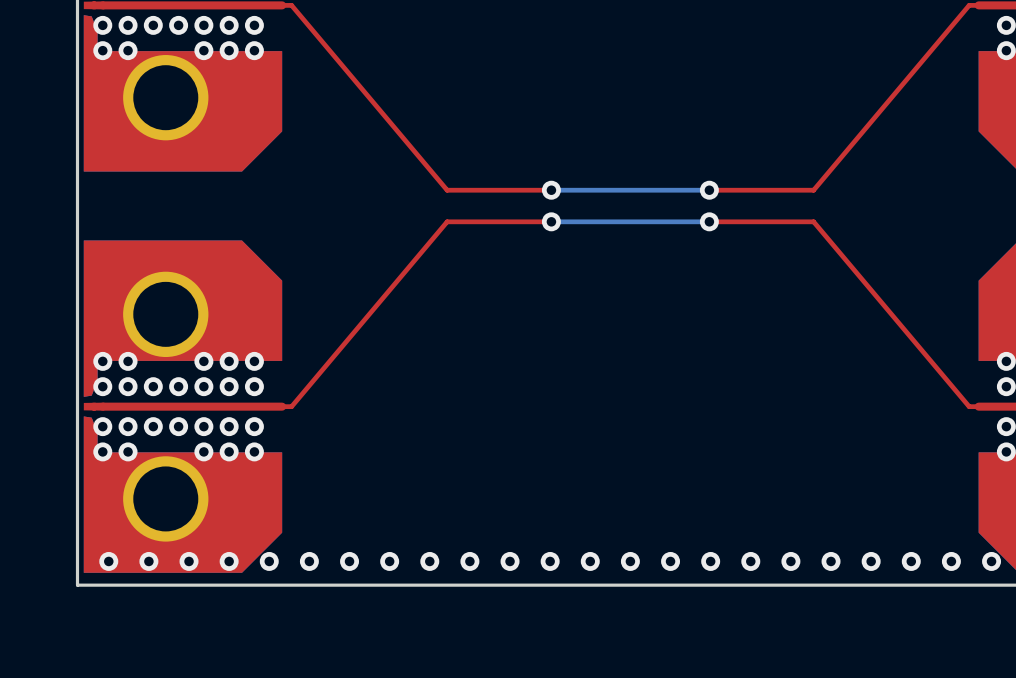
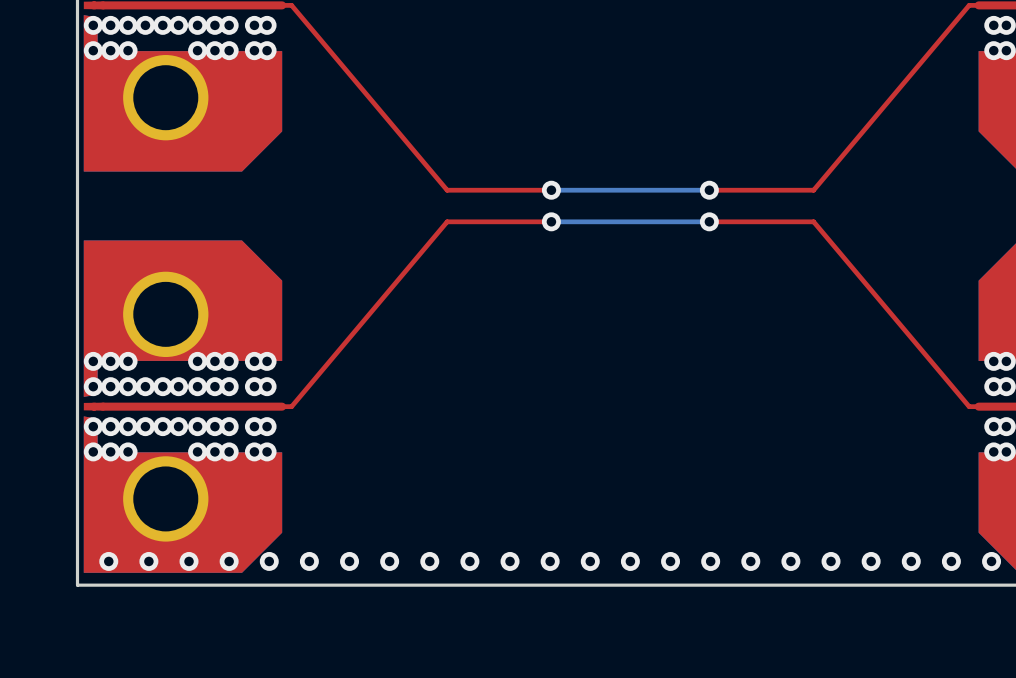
via: none -> (93, 25)
via: (102, 25) -> none
via: none -> (110, 25)
via: none -> (145, 25)
via: (153, 25) -> none
via: none -> (162, 25)
via: none -> (197, 25)
via: (203, 25) -> none
via: none -> (214, 25)
via: none -> (267, 25)
via: none -> (993, 25)
via: none -> (93, 50)
via: (102, 50) -> none
via: none -> (110, 50)
via: none -> (197, 50)
via: (203, 50) -> none
via: none -> (214, 50)
via: none -> (267, 50)
via: none -> (993, 50)
via: none -> (93, 361)
via: (102, 361) -> none
via: none -> (110, 361)
via: none -> (197, 361)
via: (203, 361) -> none
via: none -> (214, 361)
via: none -> (267, 361)
via: none -> (993, 361)
via: none -> (93, 386)
via: (102, 386) -> none
via: none -> (110, 386)
via: none -> (145, 386)
via: (153, 386) -> none
via: none -> (162, 386)
via: none -> (197, 386)
via: (203, 386) -> none
via: none -> (214, 386)
via: none -> (267, 386)
via: none -> (993, 386)
via: none -> (93, 426)
via: (102, 426) -> none
via: none -> (110, 426)
via: none -> (145, 426)
via: (153, 426) -> none
via: none -> (162, 426)
via: none -> (197, 426)
via: (203, 426) -> none
via: none -> (214, 426)
via: none -> (267, 426)
via: none -> (993, 426)
via: none -> (93, 451)
via: (102, 451) -> none
via: none -> (110, 451)
via: none -> (197, 451)
via: (203, 451) -> none
via: none -> (214, 451)
via: none -> (267, 451)
via: none -> (993, 451)

